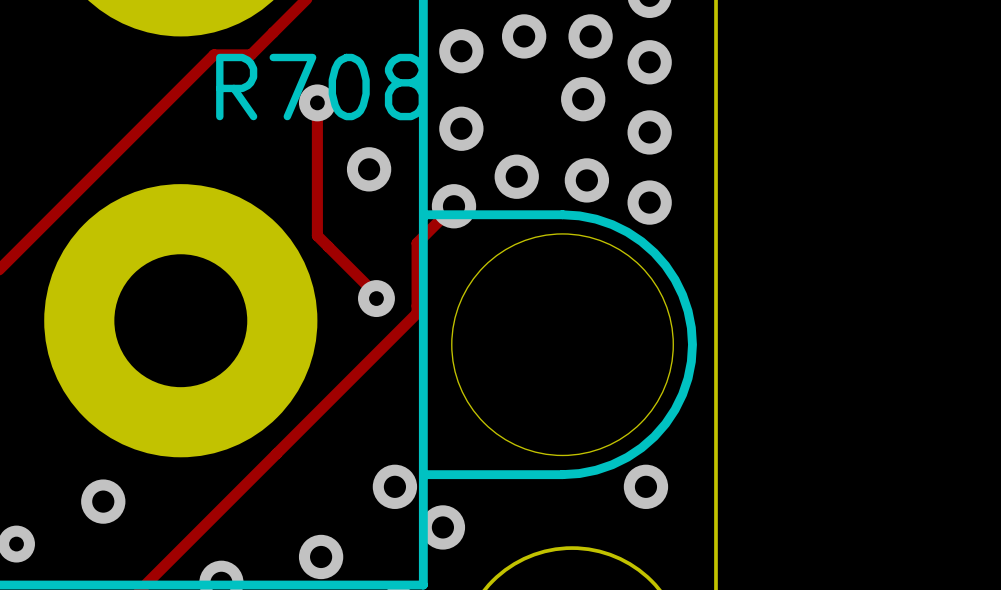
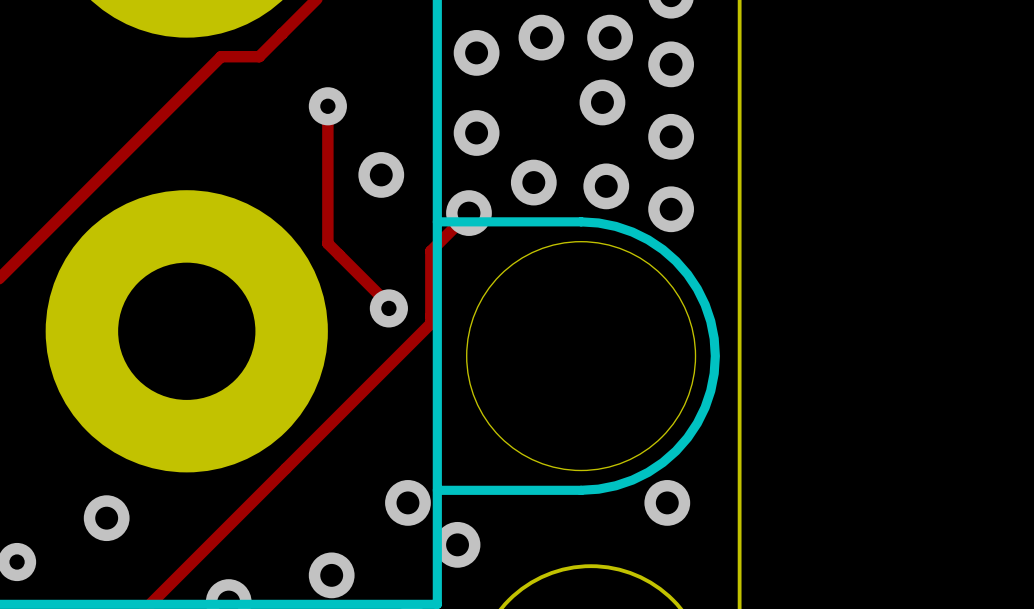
R708: (321, 87) -> none

